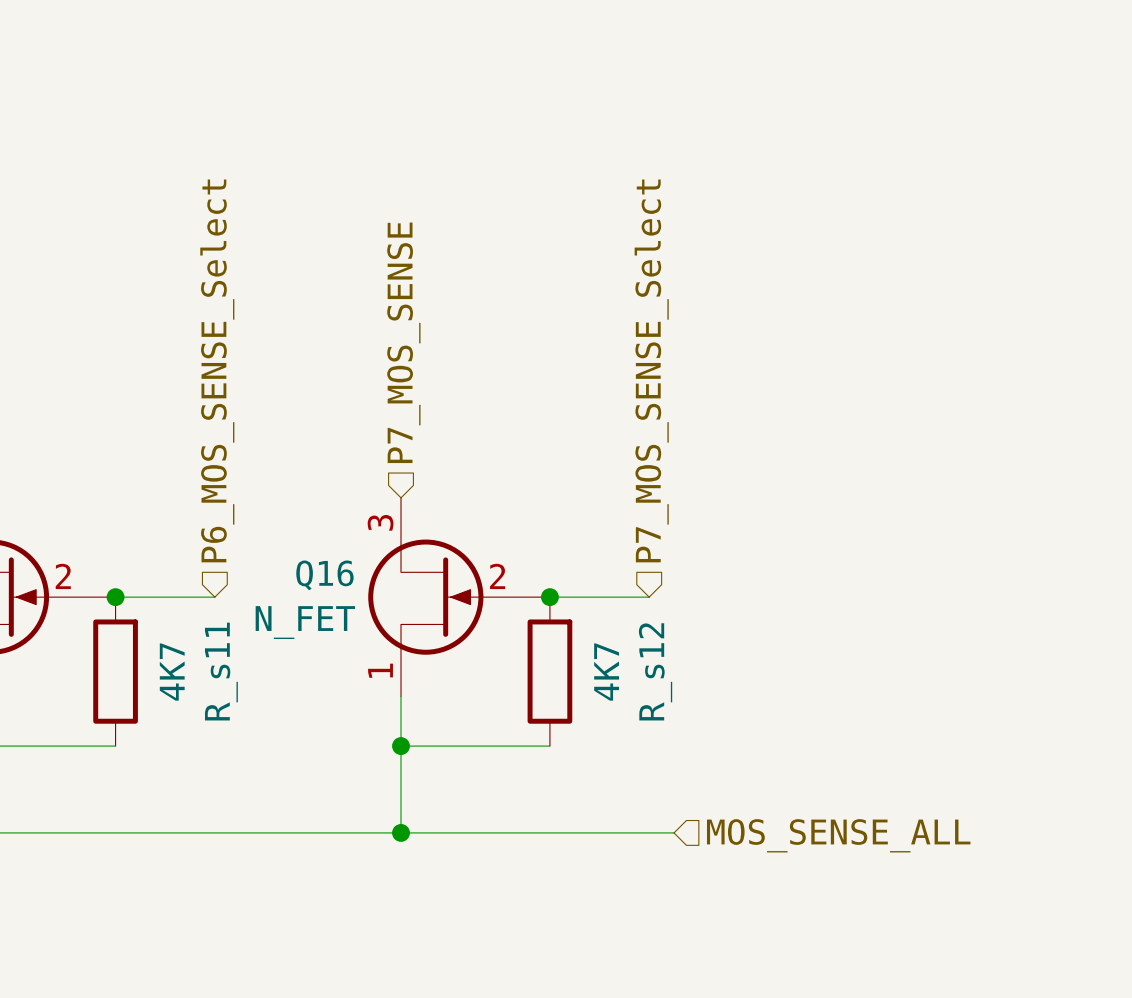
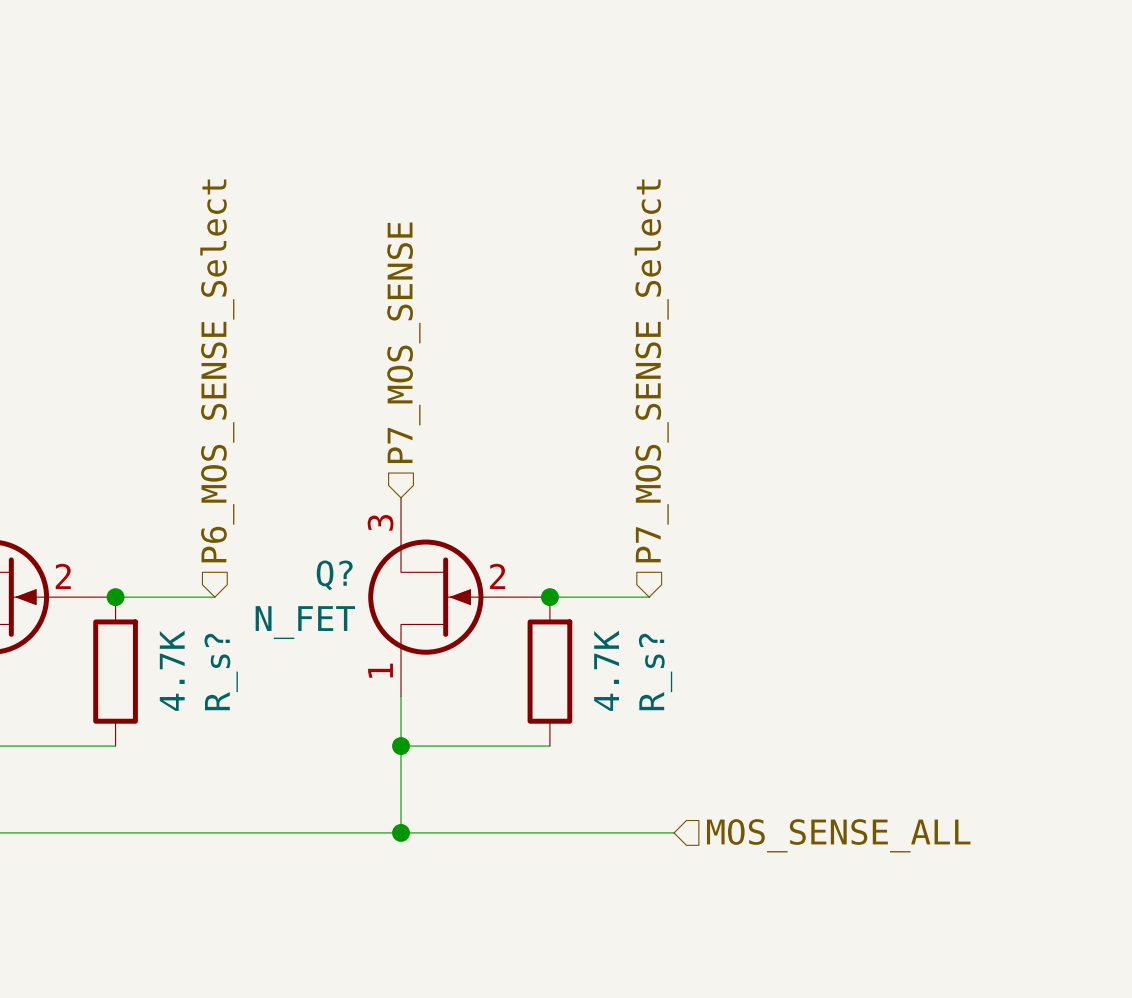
Q16 name: Q16 (324, 575) -> Q? (334, 575)
R_s11 name: R_s11 (221, 671) -> R_s? (221, 672)
R_s12 name: R_s12 (655, 671) -> R_s? (655, 672)
R_s11 value: 4K7 (172, 672) -> 4.7K (172, 670)
R_s12 value: 4K7 (606, 672) -> 4.7K (606, 670)

